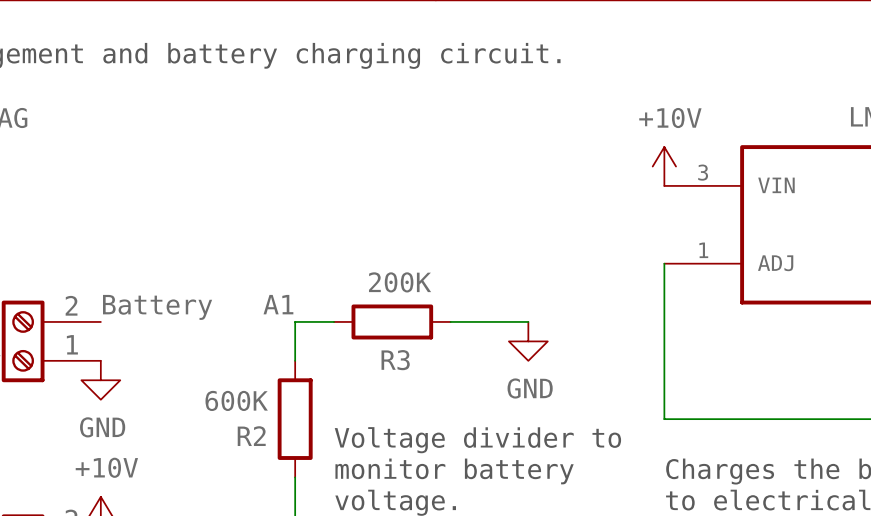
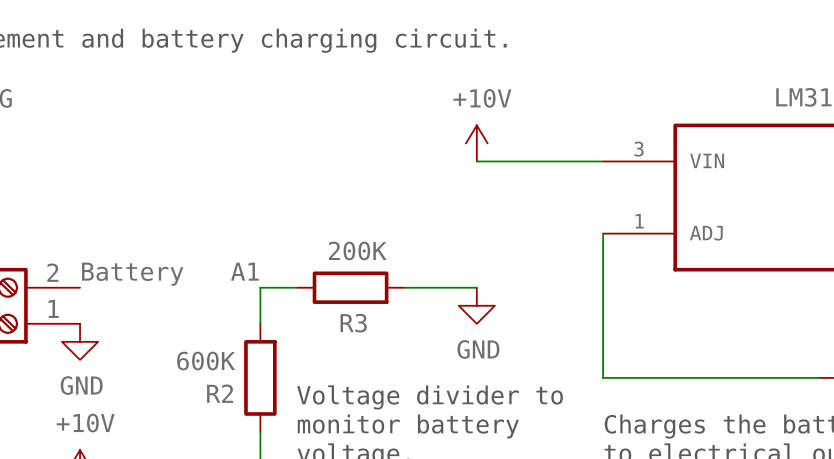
power symbol position: +10V (664, 166) -> +10V (476, 143)
wire: none -> (476, 161) (603, 161)

